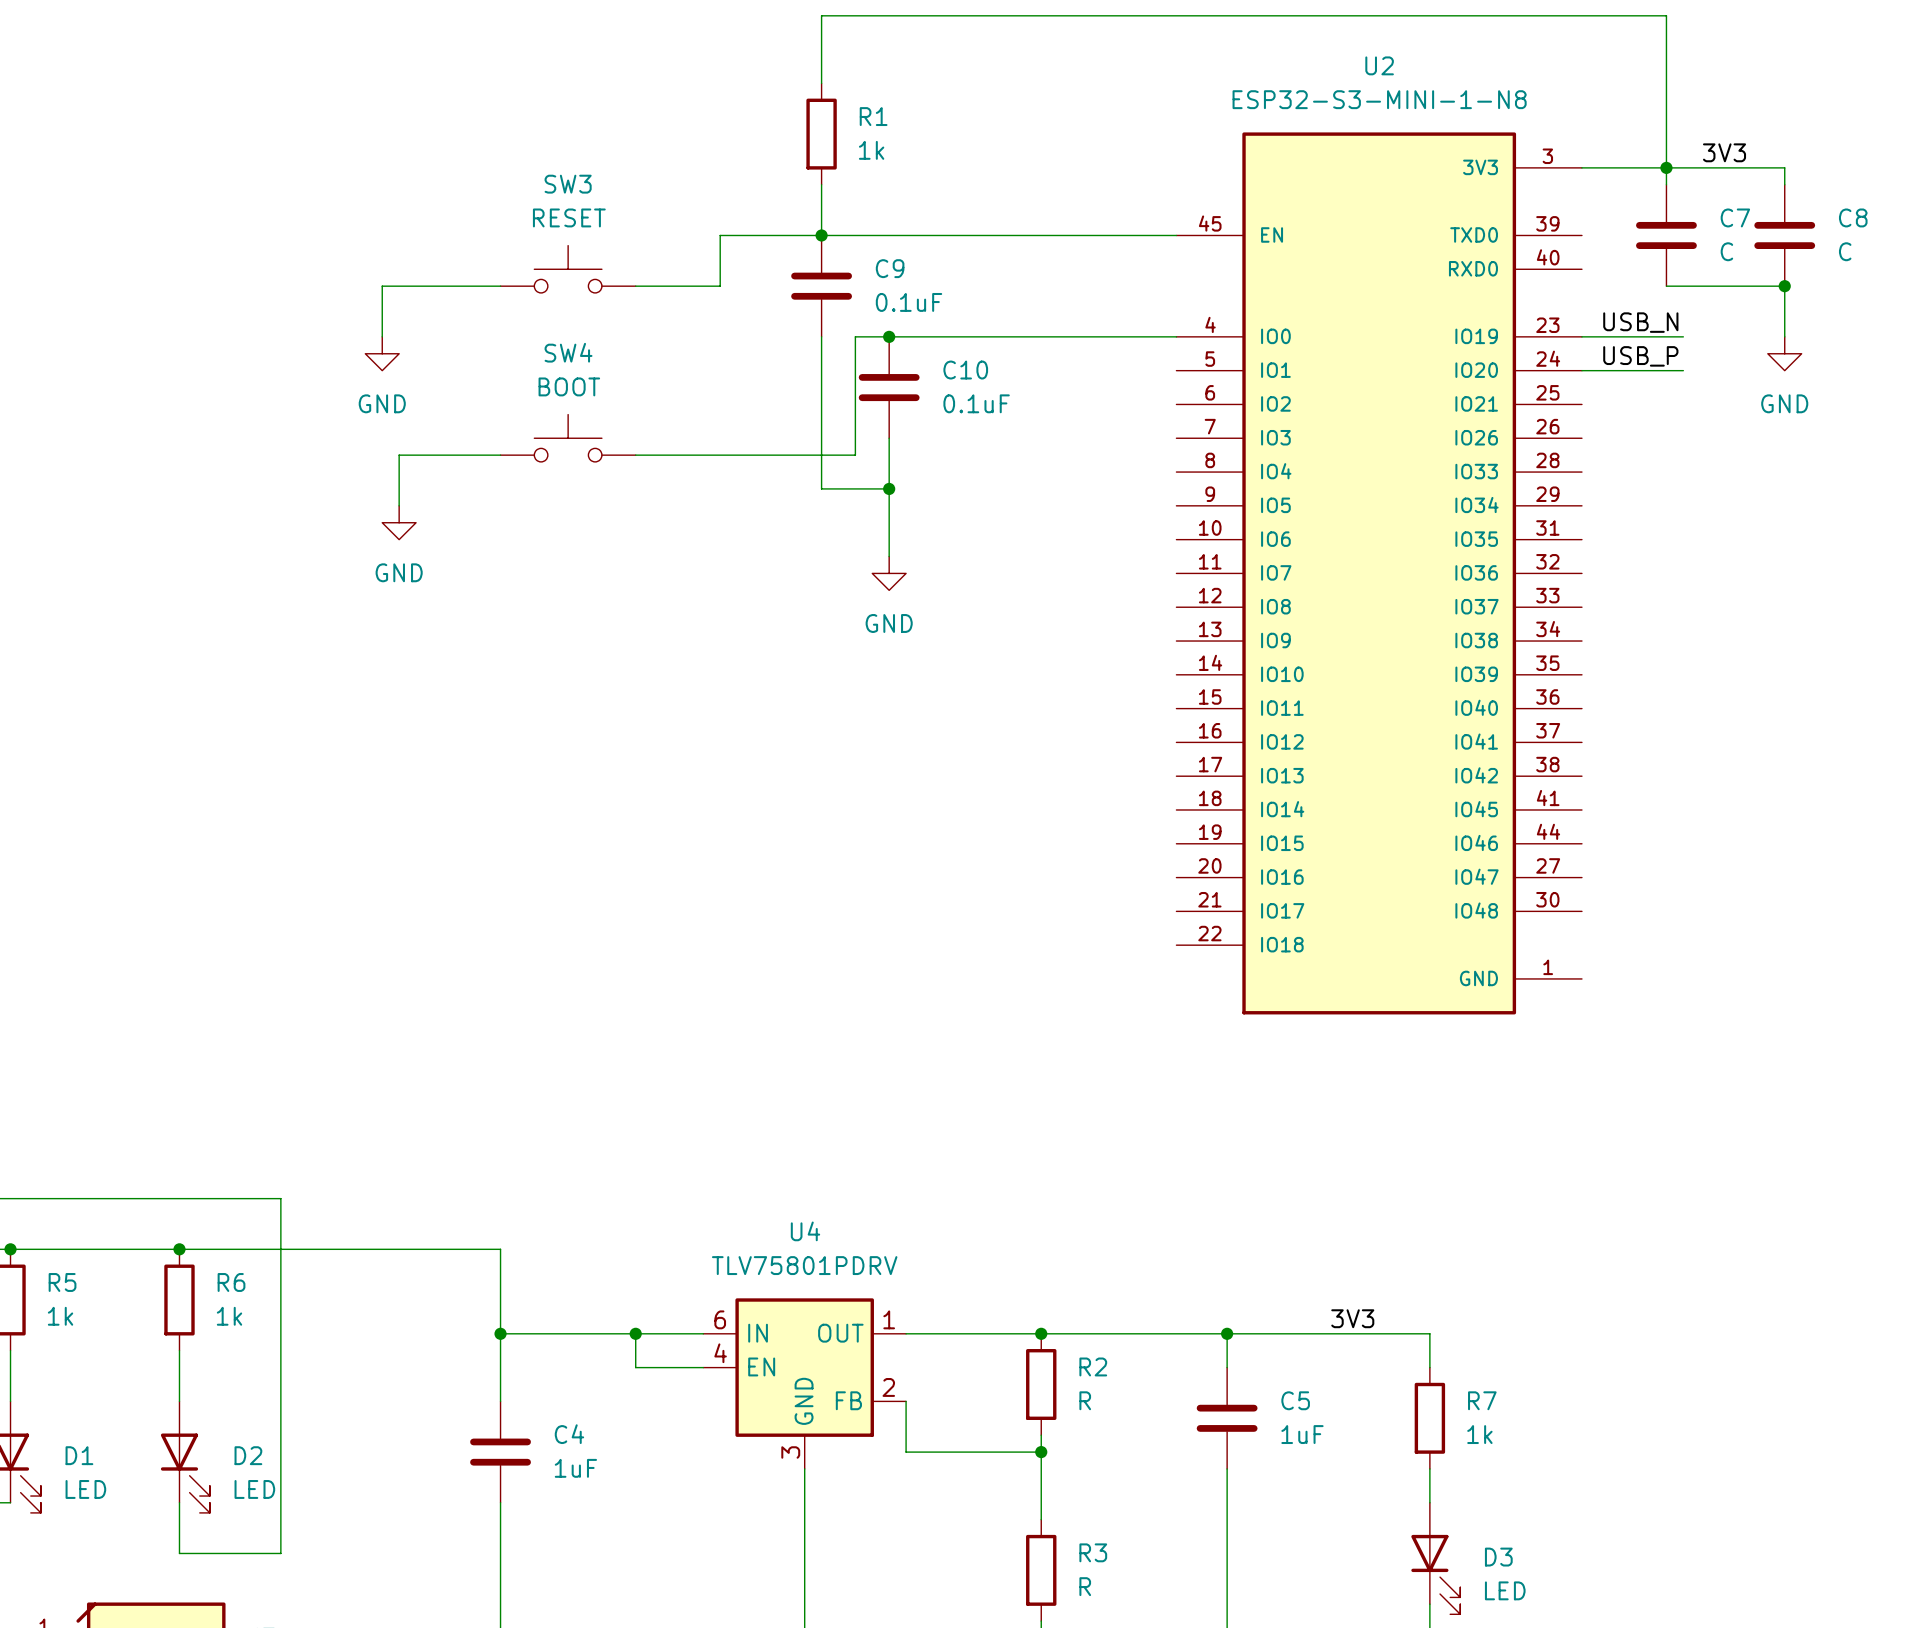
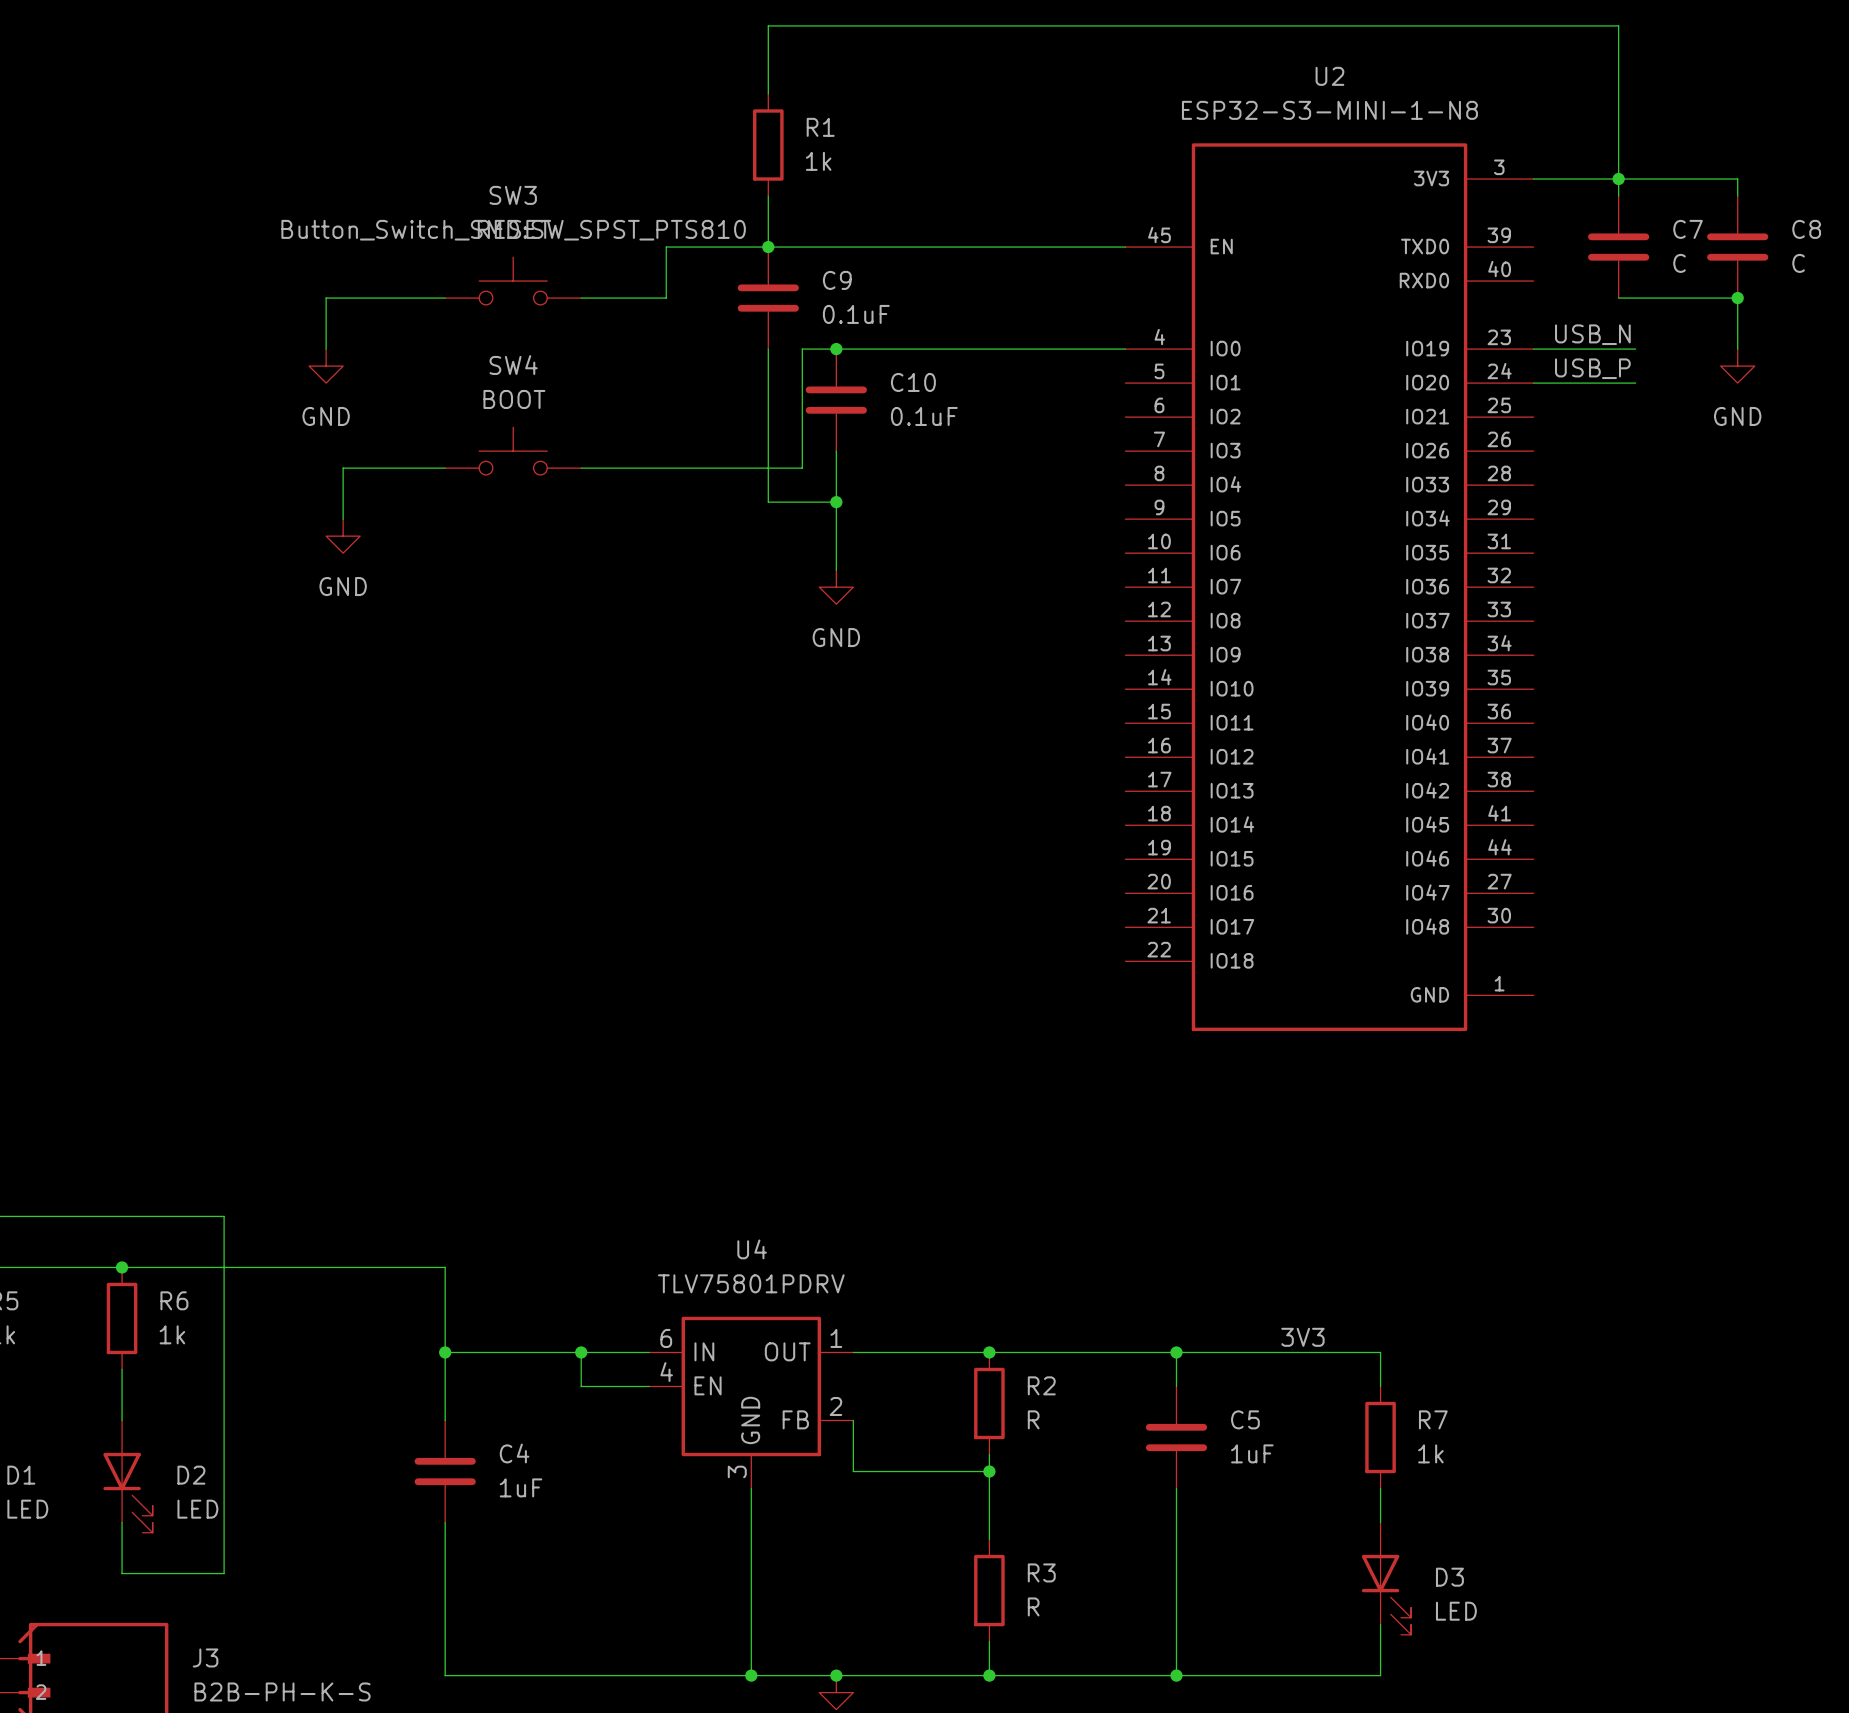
label: 3V3 (1724, 152) -> none
SW3 text: none -> Button_Switch_SMD:SW_SPST_PTS810 (513, 230)

